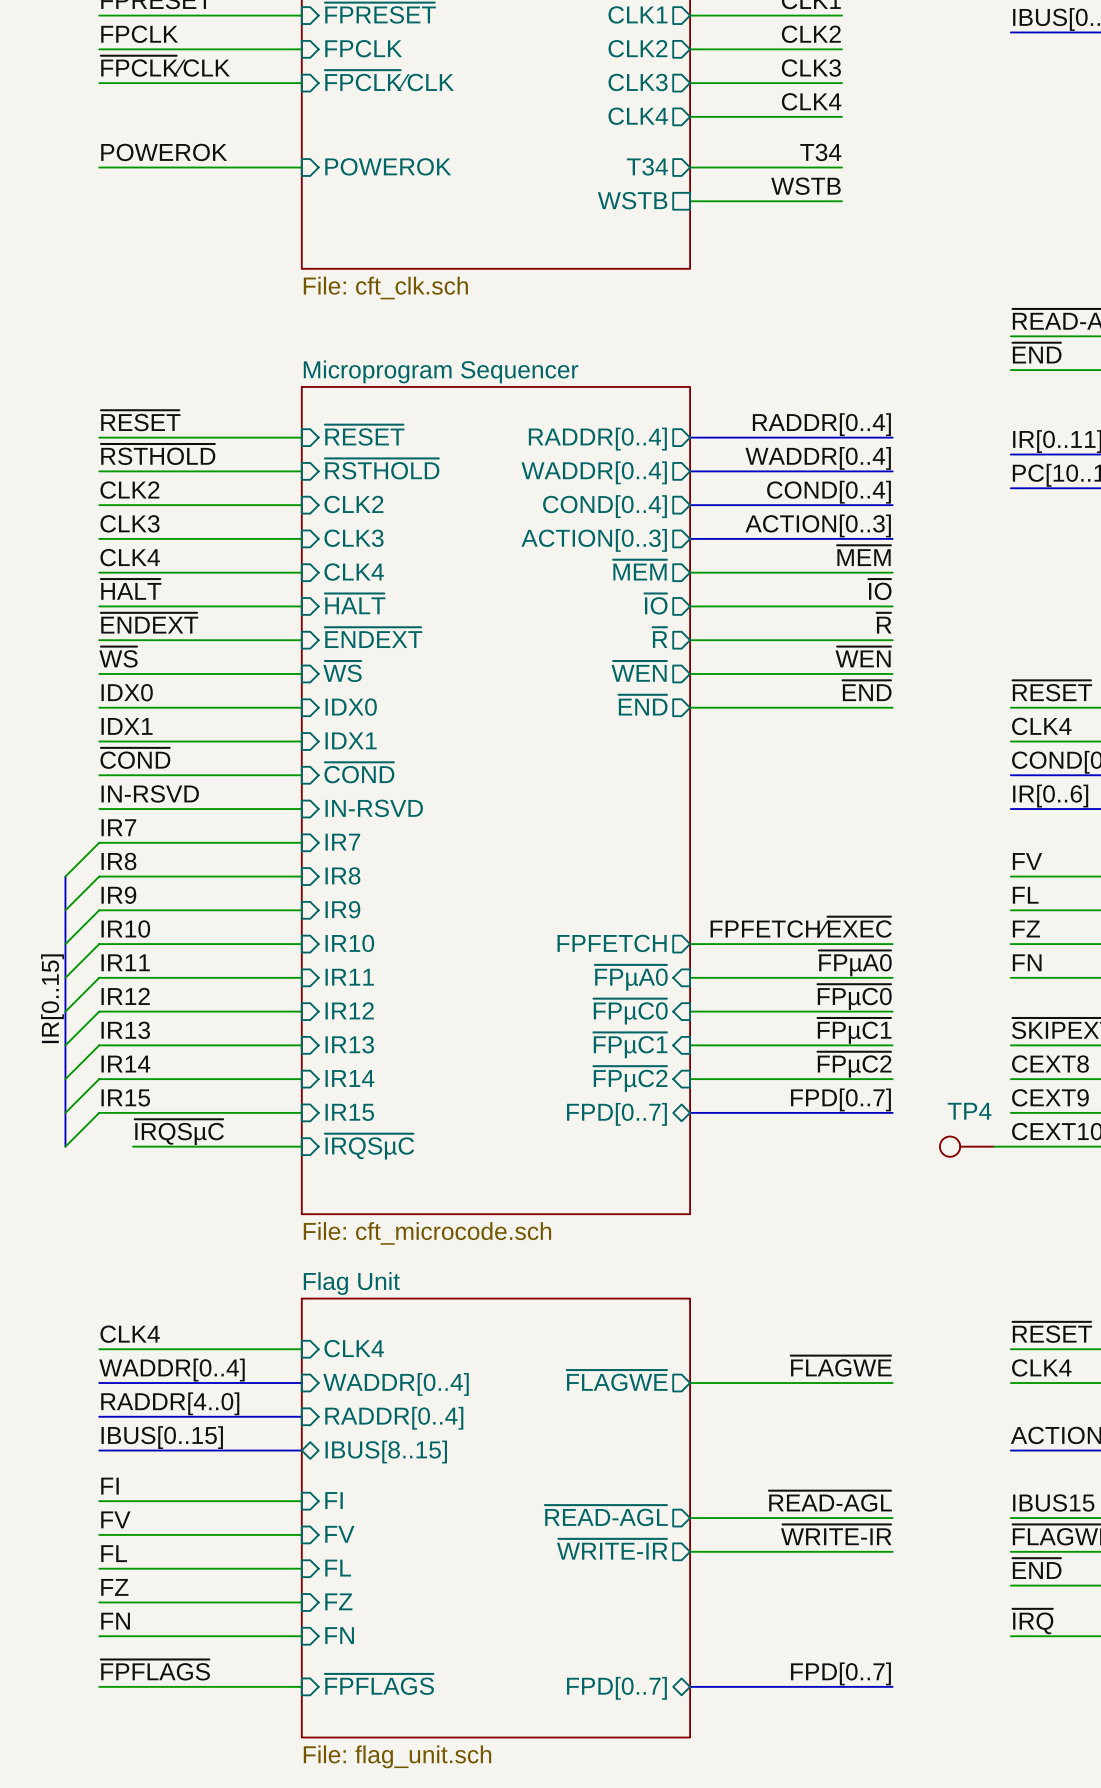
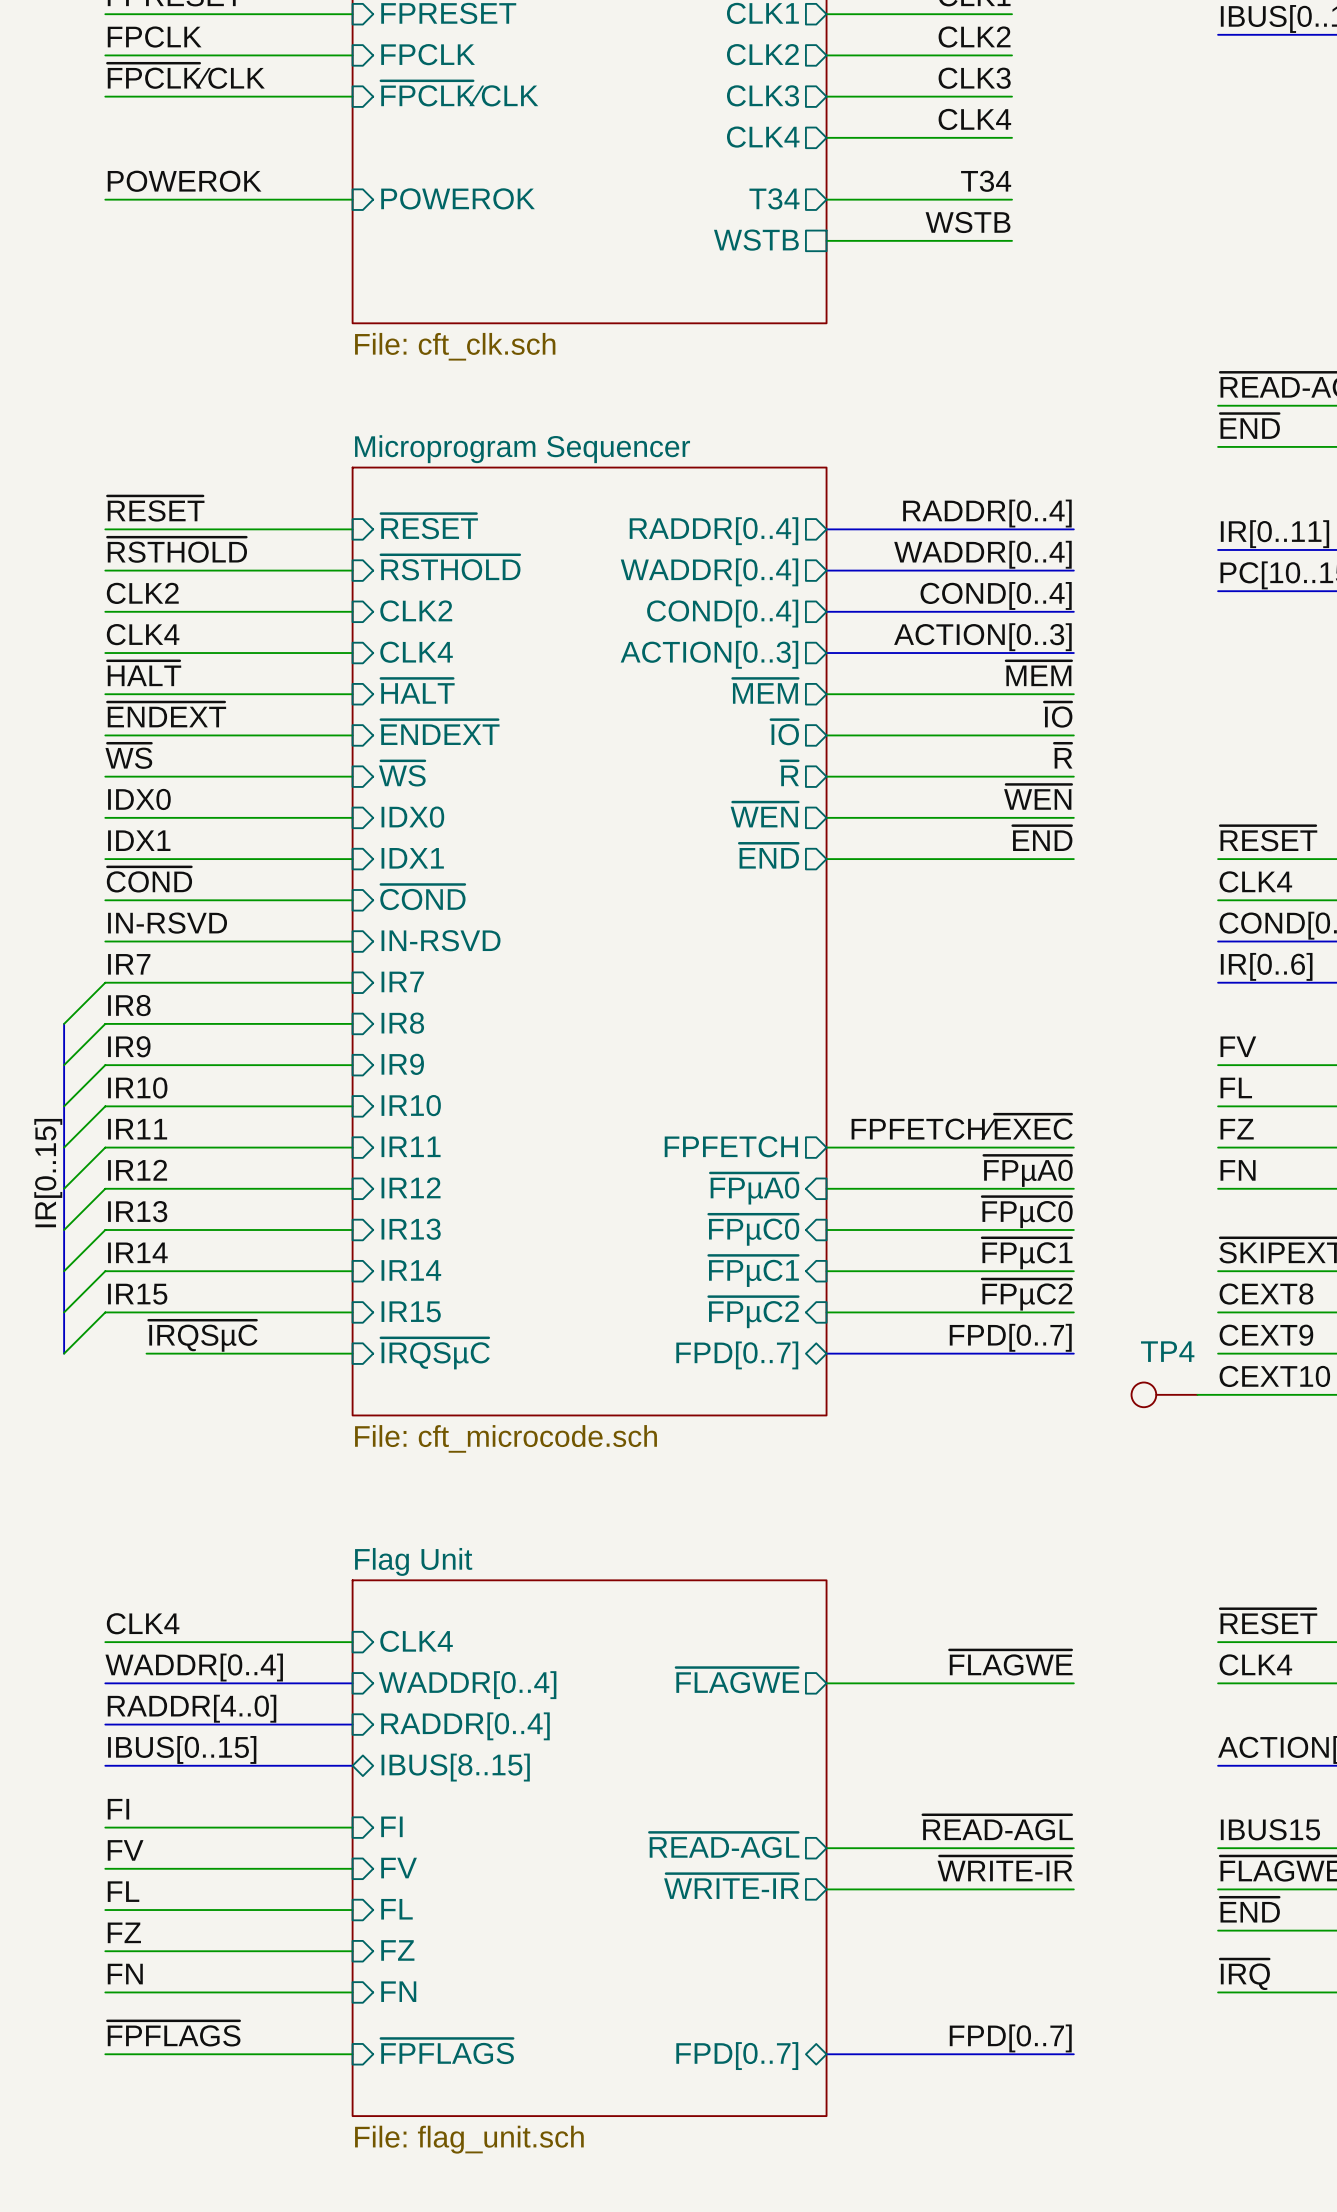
label: CLK3 (129, 523) -> CLK4 (143, 634)
sheet pin: CLK3 (354, 538) -> CLK4 (416, 652)
label: CLK4 (130, 557) -> ~{HALT} (144, 673)
sheet pin: CLK4 (354, 572) -> ~{HALT} (417, 691)
label: ~{HALT} (131, 589) -> ~{ENDEXT} (166, 714)
sheet pin: ~{HALT} (355, 603) -> ~{ENDEXT} (440, 732)
label: ~{ENDEXT} (149, 623) -> ~{WS} (128, 756)
sheet pin: ~{ENDEXT} (373, 637) -> ~{WS} (402, 773)
label: ~{WS} (118, 657) -> IDX0 (139, 799)
sheet pin: ~{WS} (342, 671) -> IDX0 (412, 817)
label: IDX0 (127, 692) -> IDX1 (139, 840)
sheet pin: IDX0 (351, 707) -> IDX1 (412, 858)
label: IDX1 (127, 726) -> ~{COND} (149, 879)
sheet pin: IDX1 (351, 740) -> ~{COND} (422, 897)
label: ~{COND} (135, 758) -> IN-RSVD (167, 923)
sheet pin: ~{COND} (359, 772) -> IN-RSVD (441, 940)
sheet Microprogram Sequencer: none -> File: cft_microcode.sch (589, 941)
label: IN-RSVD (150, 793) -> IR7 (129, 964)
sheet Microprogram Sequencer: File: cft_microcode.sch (495, 800) -> none
sheet pin: IN-RSVD (374, 808) -> IR7 (402, 981)
wire: none -> (105, 982) (64, 1023)
label: IR7 (118, 827) -> IR8 (129, 1005)
sheet pin: IR7 (342, 842) -> IR8 (402, 1023)
label: IR8 (118, 861) -> IR9 (129, 1046)
sheet pin: IR8 (342, 875) -> IR9 (402, 1064)
label: IR9 (118, 895) -> IR10 (137, 1087)
sheet pin: IR9 (342, 909) -> IR10 (411, 1105)
label: IR10 (125, 929) -> IR11 (137, 1129)
sheet pin: IR10 (349, 943) -> IR11 (411, 1146)
label: IR11 (125, 962) -> IR12 (137, 1170)
sheet pin: IR11 (349, 977) -> IR12 (411, 1187)
label: IR12 (125, 996) -> IR13 (137, 1211)
label position: IR[0..15] (52, 998) -> IR[0..15] (48, 1173)
sheet pin: IR12 (349, 1010) -> IR13 (411, 1229)
label: IR13 (125, 1030) -> IR14 (137, 1252)
sheet pin: IR13 (349, 1044) -> IR14 (411, 1270)
label: IR14 (125, 1064) -> IR15 (137, 1294)
sheet pin: IR14 (349, 1078) -> IR15 (411, 1311)
label: IR15 (125, 1097) -> none
bus: (65, 1112) (65, 1146) -> (64, 1023) (64, 1065)
wire: (132, 1112) (99, 1112) (65, 1146) -> none
sheet pin: IR15 (349, 1112) -> ~{IRQSµC} (435, 1353)
label position: ~{IRQSµC} (179, 1132) -> ~{IRQSµC} (203, 1335)
wire: (132, 1146) (301, 1146) -> none
sheet pin: ~{IRQSµC} (369, 1146) -> none

